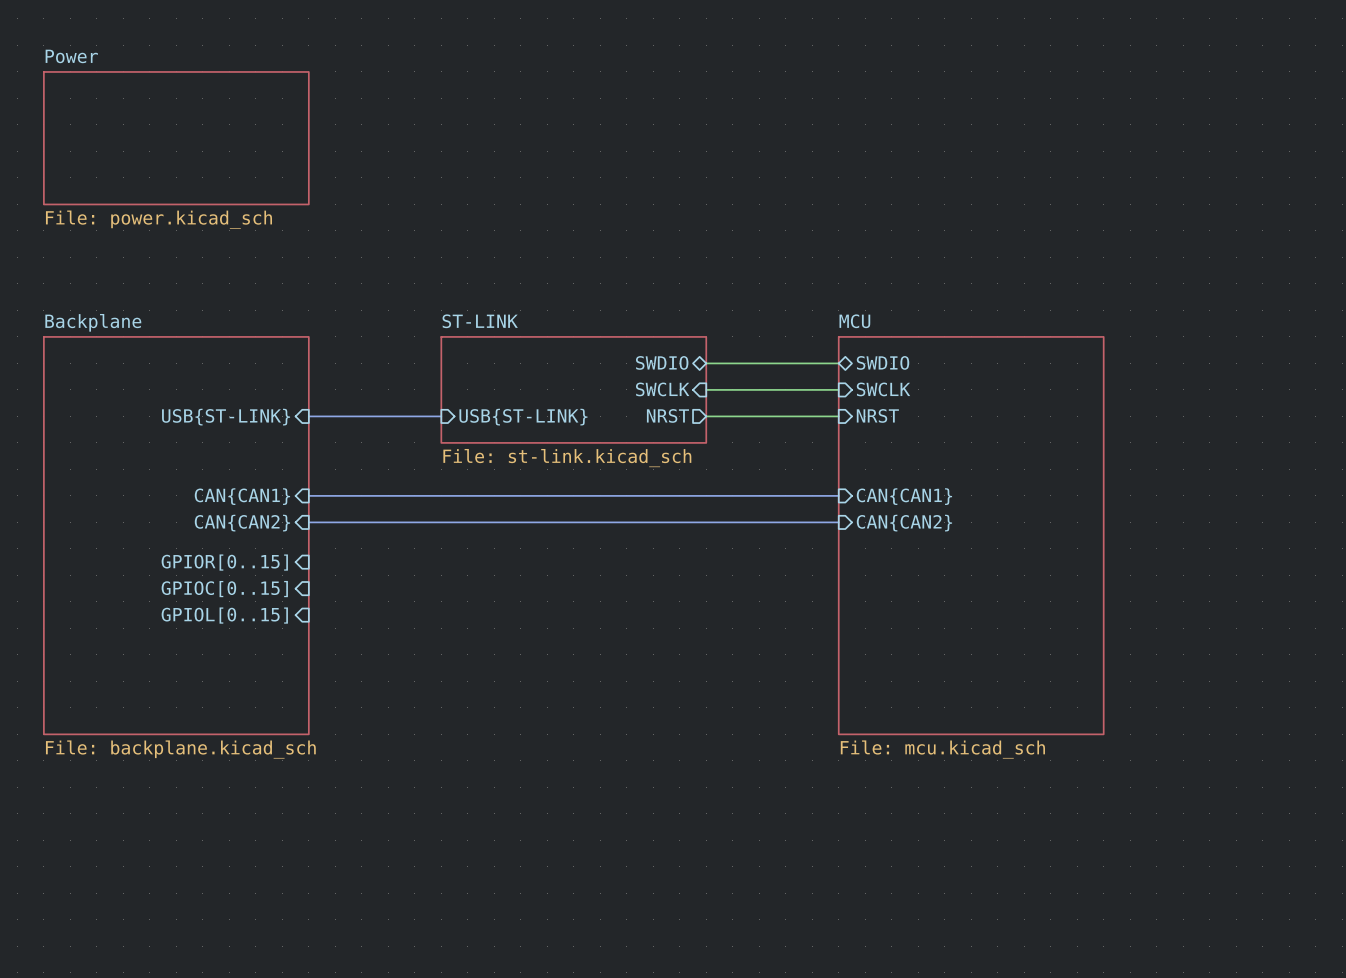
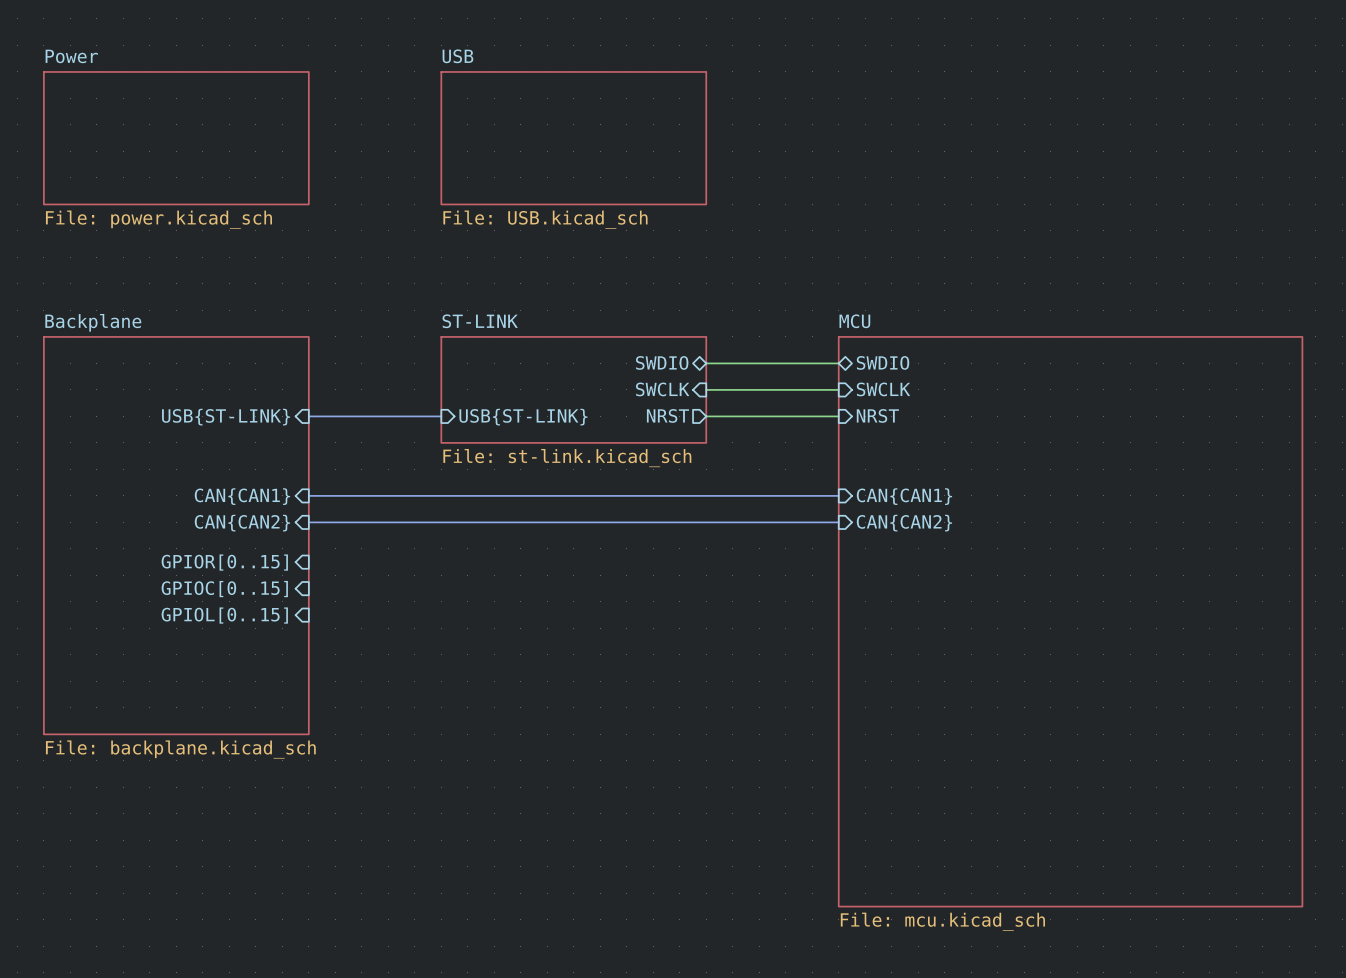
sheet USB: none -> File: USB.kicad_sch (573, 138)
sheet MCU: File: mcu.kicad_sch (971, 535) -> none
sheet MCU: none -> File: mcu.kicad_sch (1070, 621)

